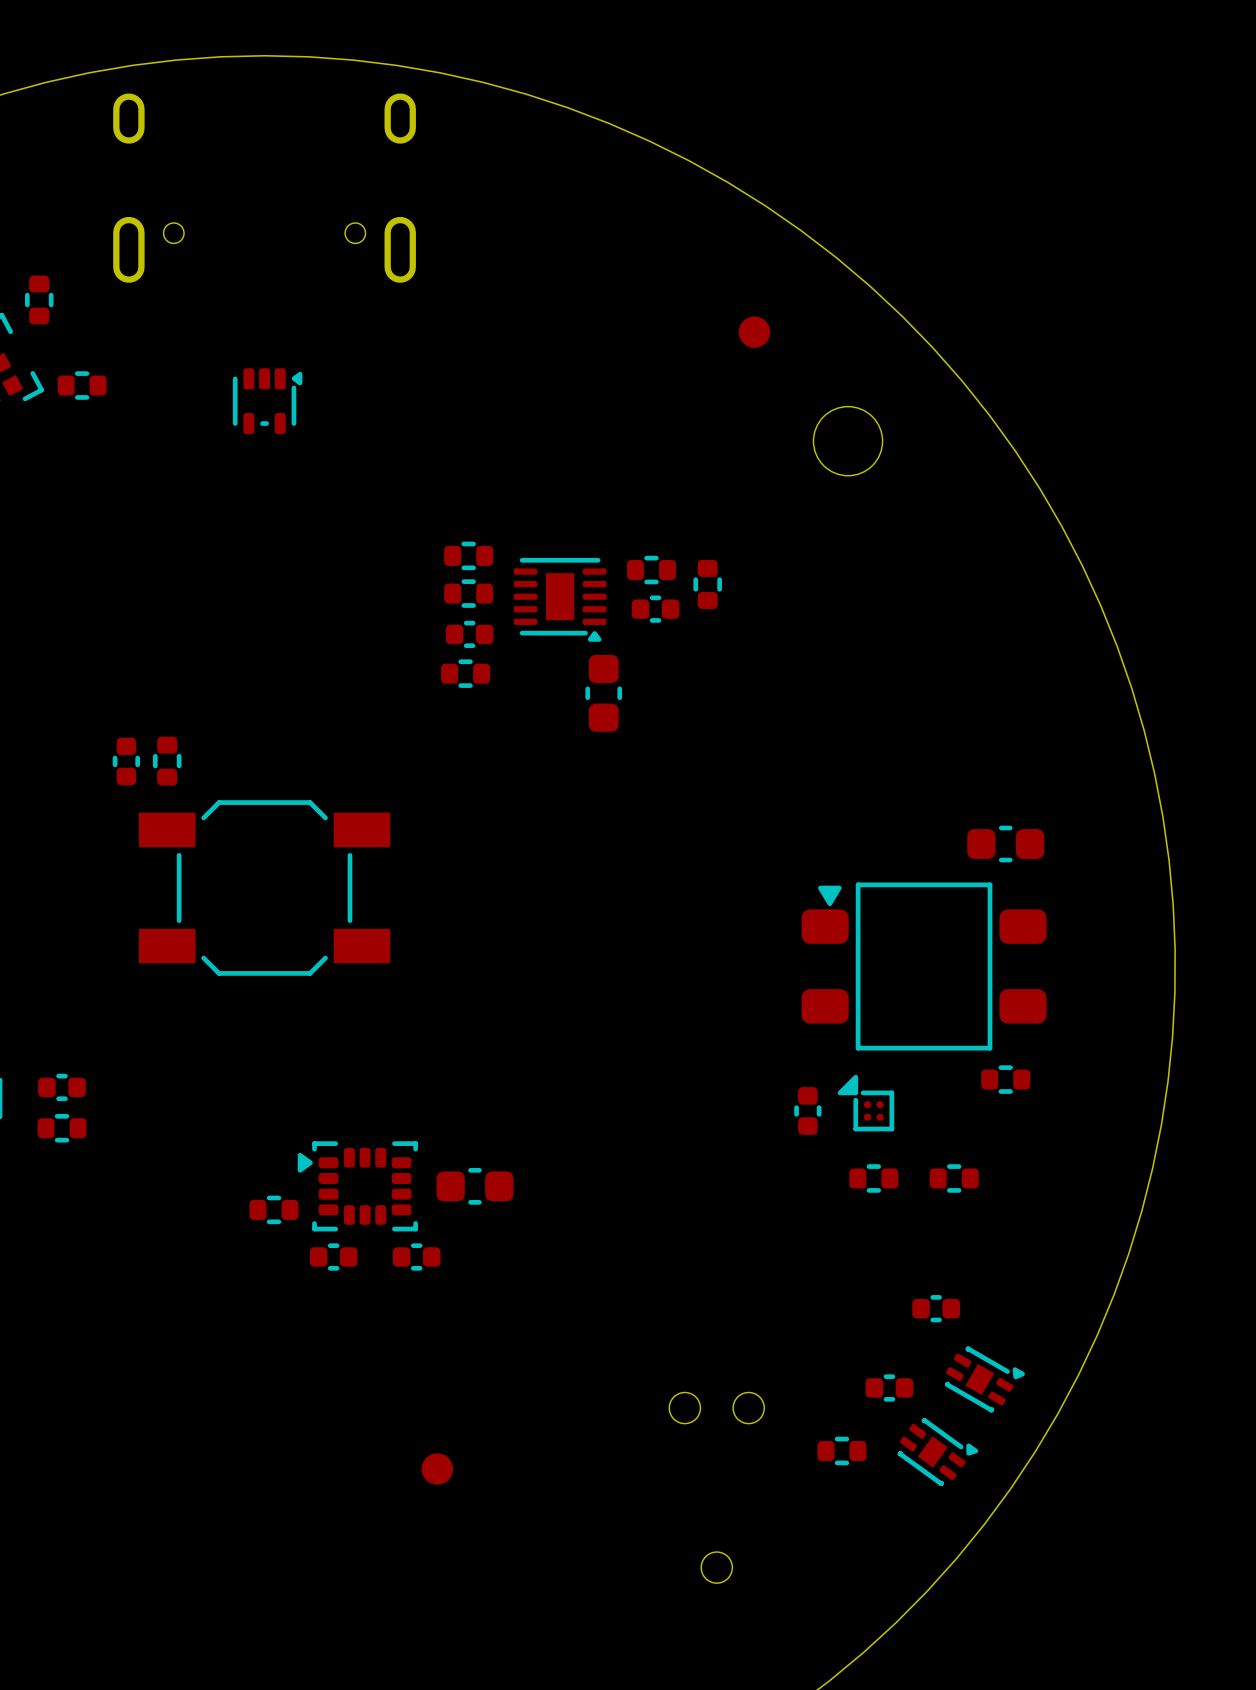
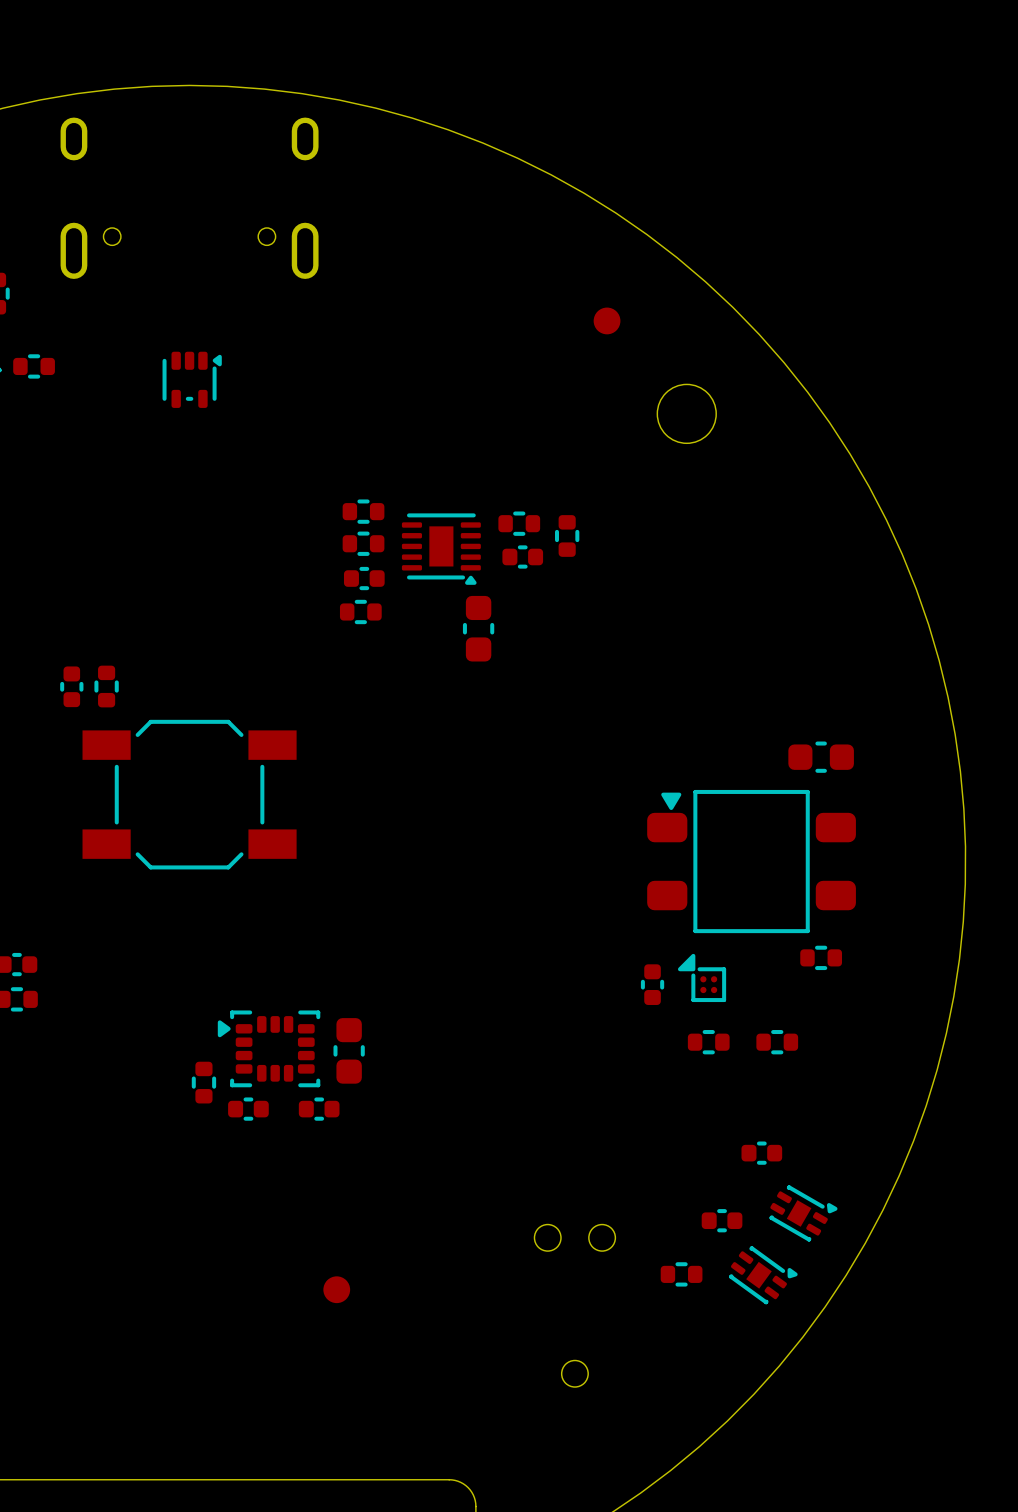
part rotation: 0° (474, 1186) -> 90° clockwise (349, 1050)
part rotation: 0° (273, 1209) -> 90° clockwise (203, 1082)

